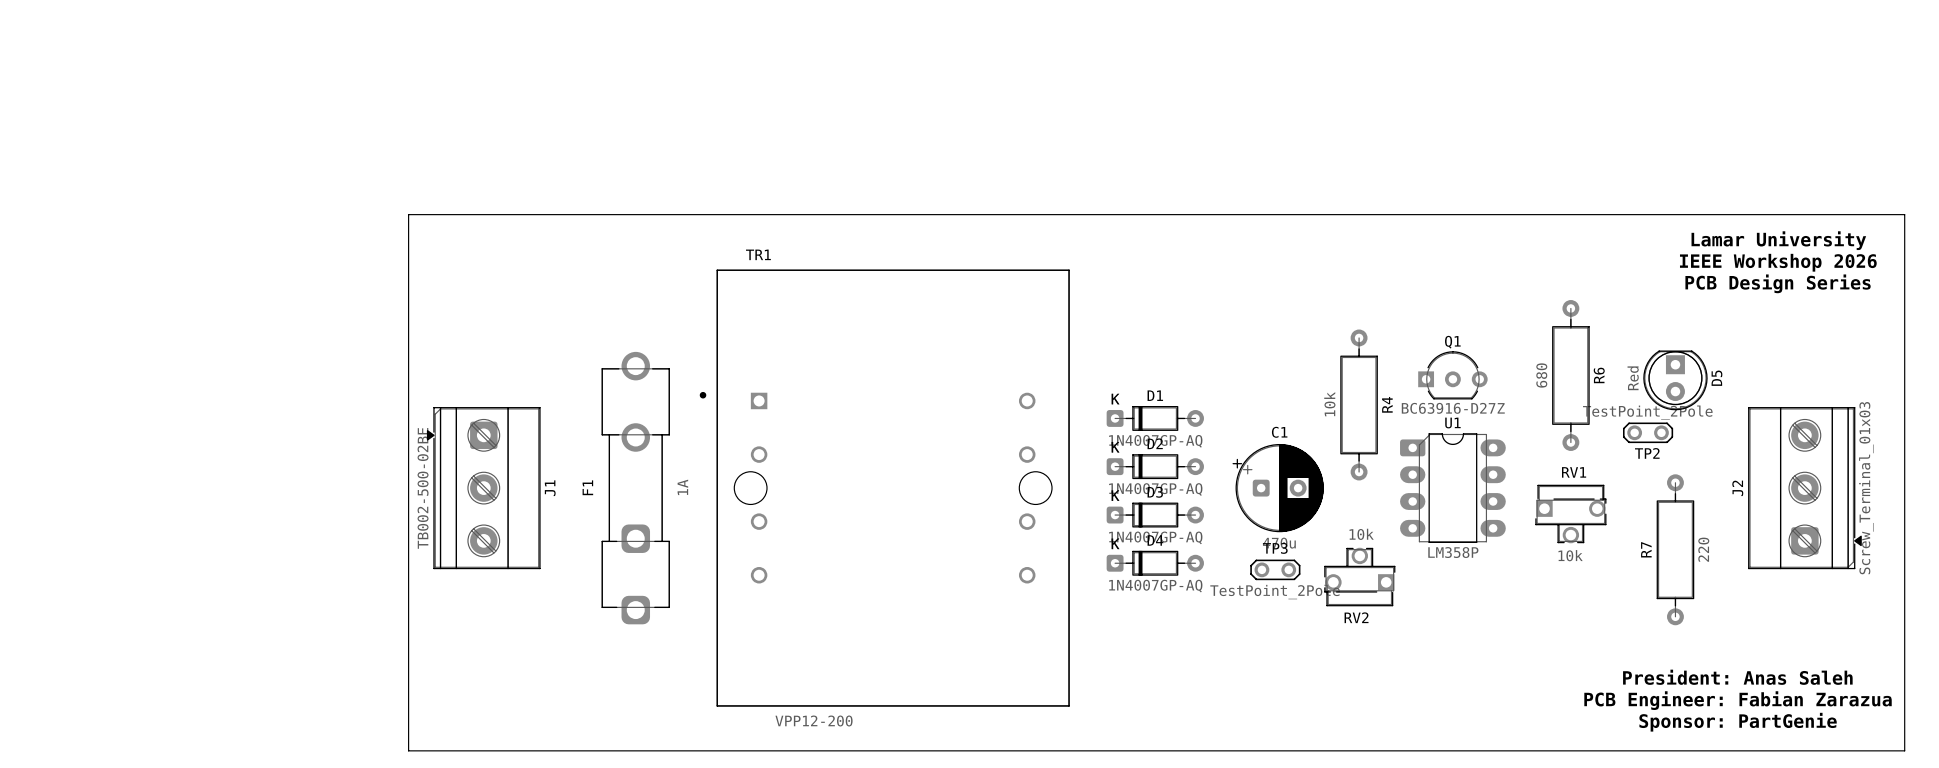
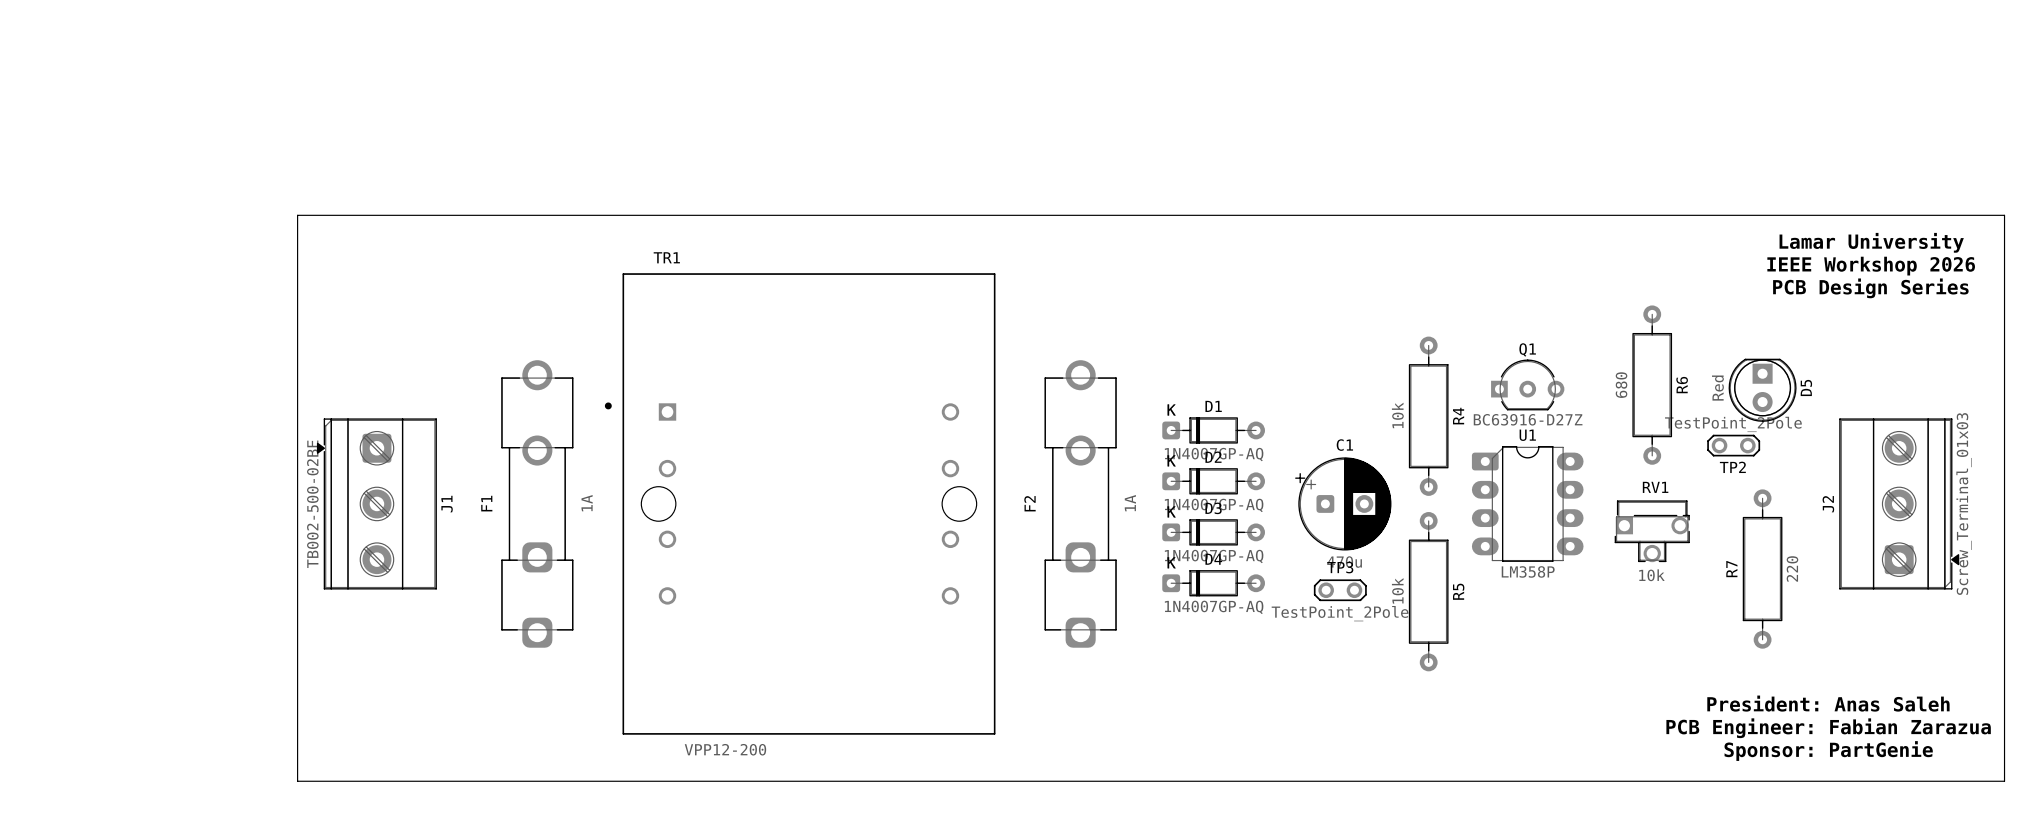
board edge: (408, 214) (408, 750) -> (425, 215) (297, 215) (297, 781) (425, 781)
J1 position: (483, 488) -> (376, 503)
F1 position: (635, 488) -> (537, 503)
TR1 position: (884, 488) -> (800, 503)
F2: none -> 1A (1080, 503)
R5: none -> 10k (1428, 591)
RV2: 10k (1359, 577) -> none

